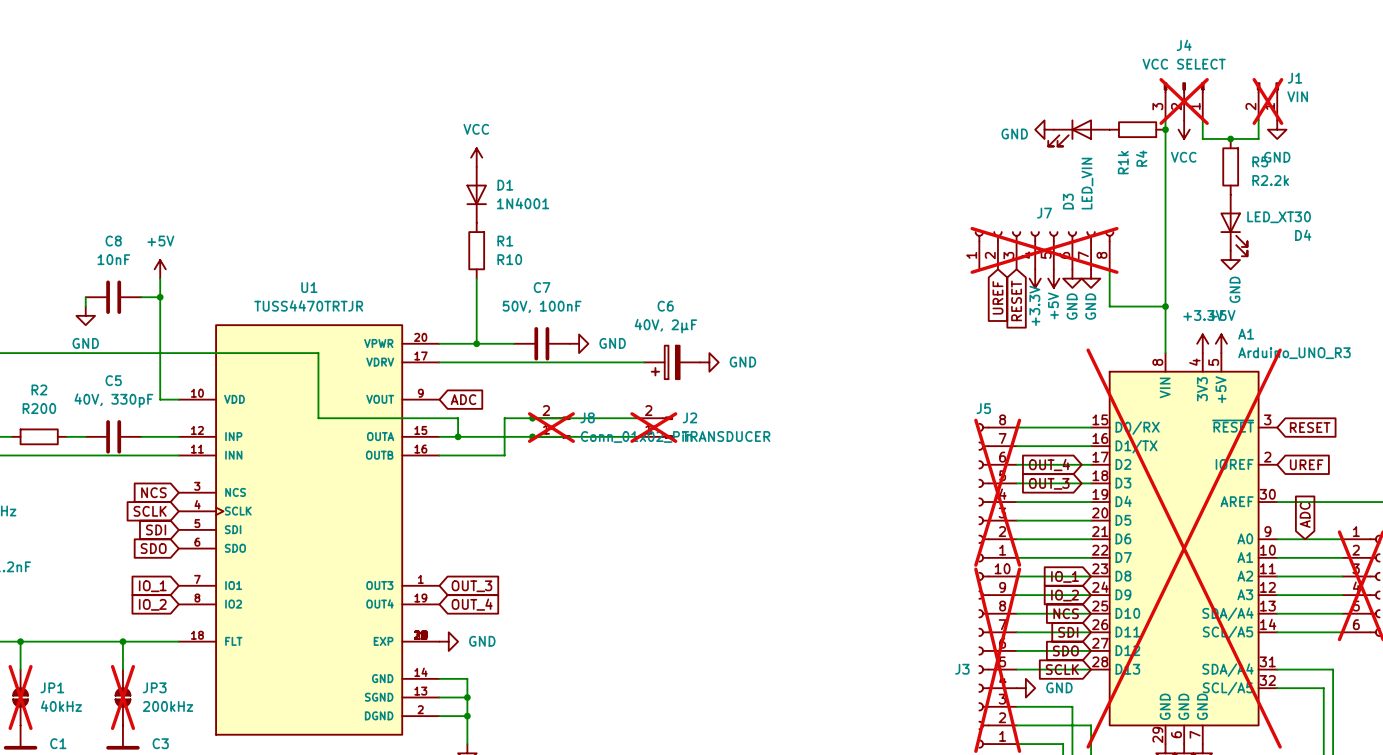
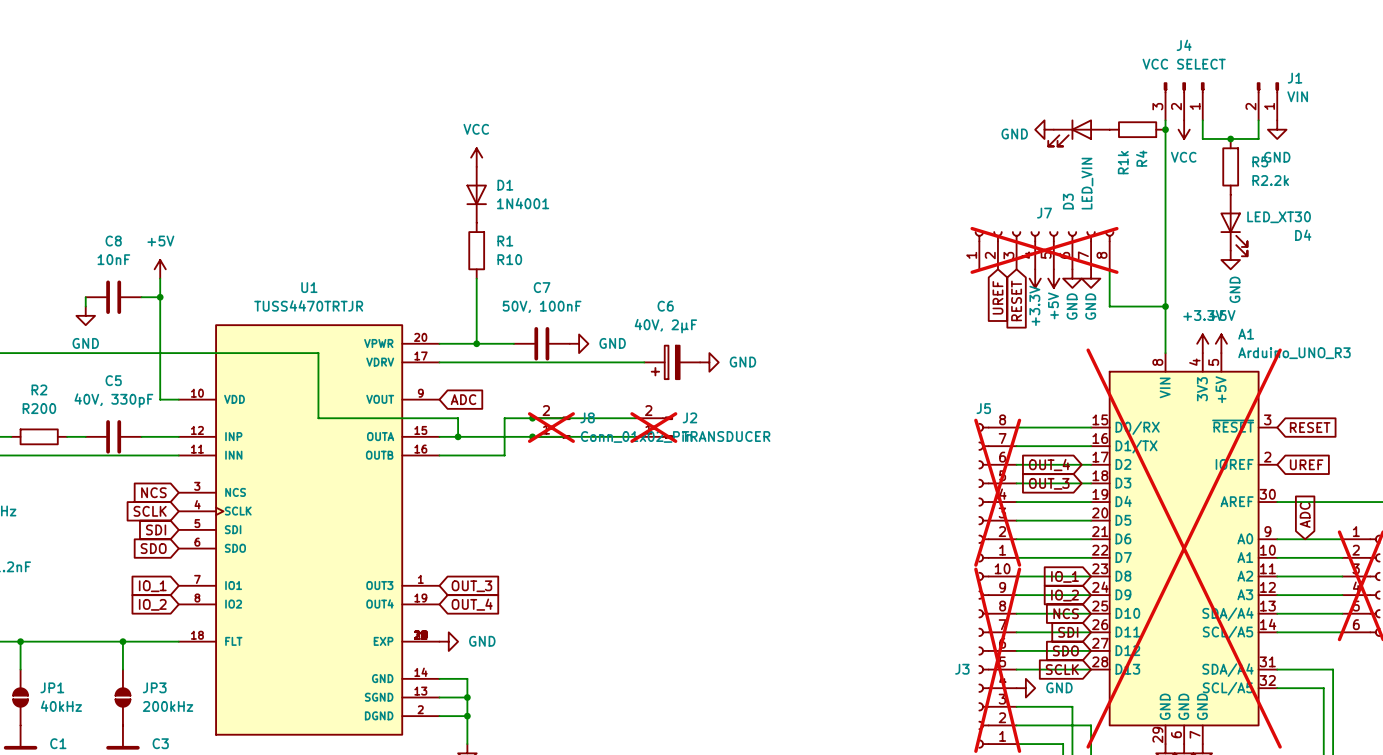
J4 do-not-place cross: (1184, 101) -> none
J1 do-not-place cross: (1267, 101) -> none
JP1 do-not-place cross: (20, 697) -> none
JP3 do-not-place cross: (122, 697) -> none

